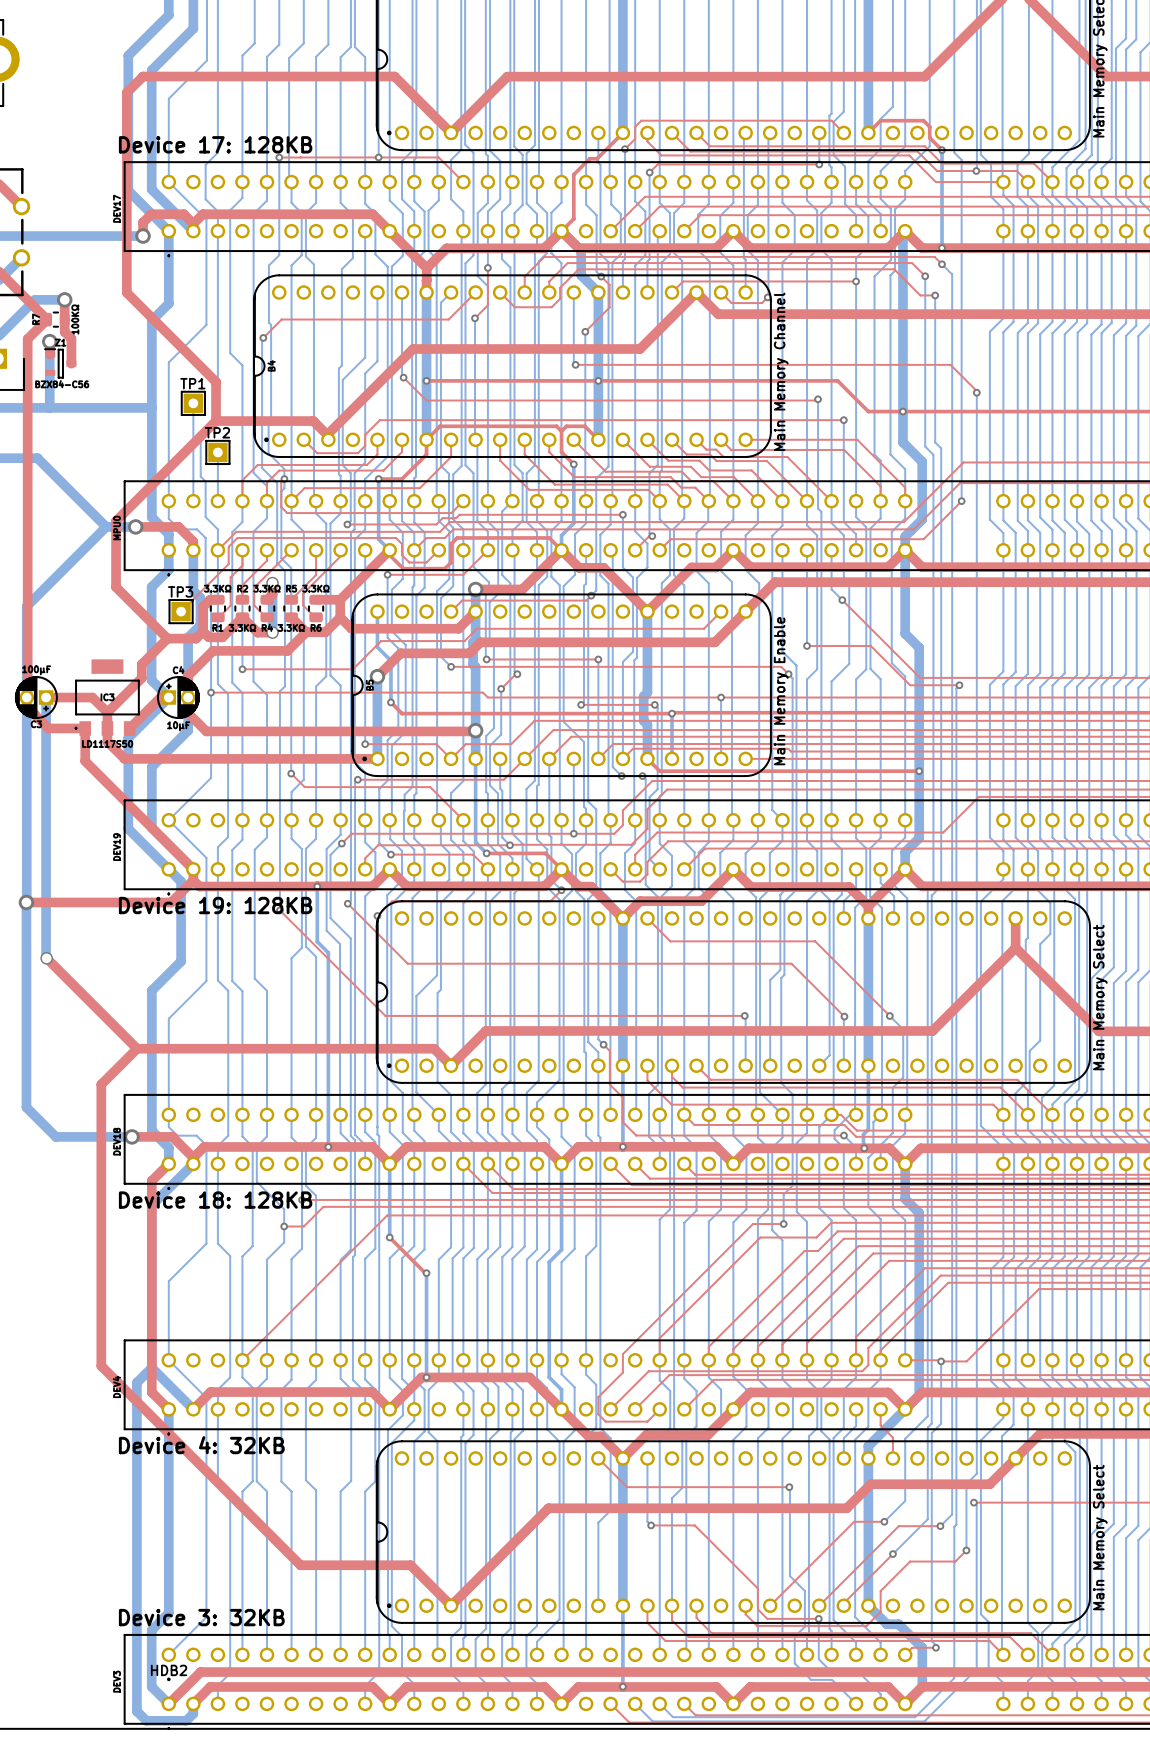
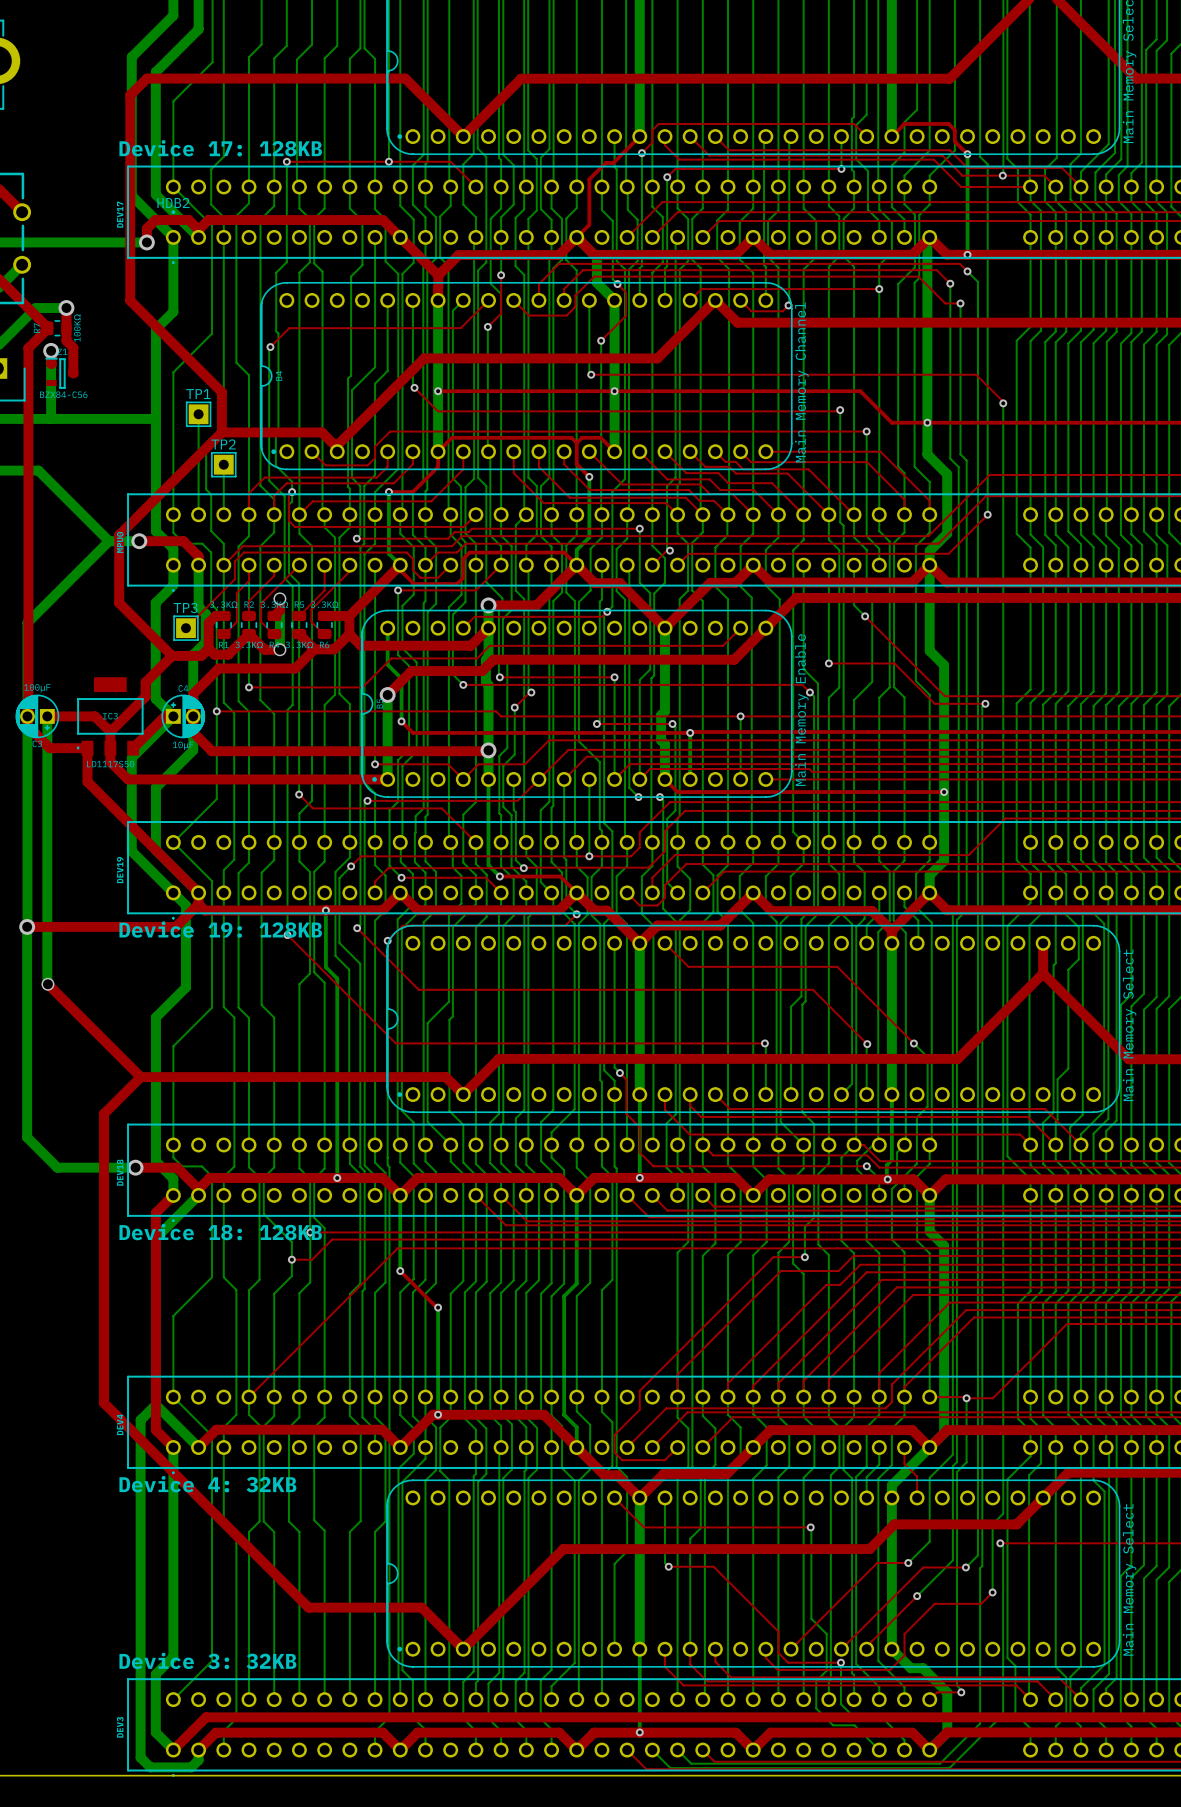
HDB2 position: (168, 1679) -> (173, 212)

